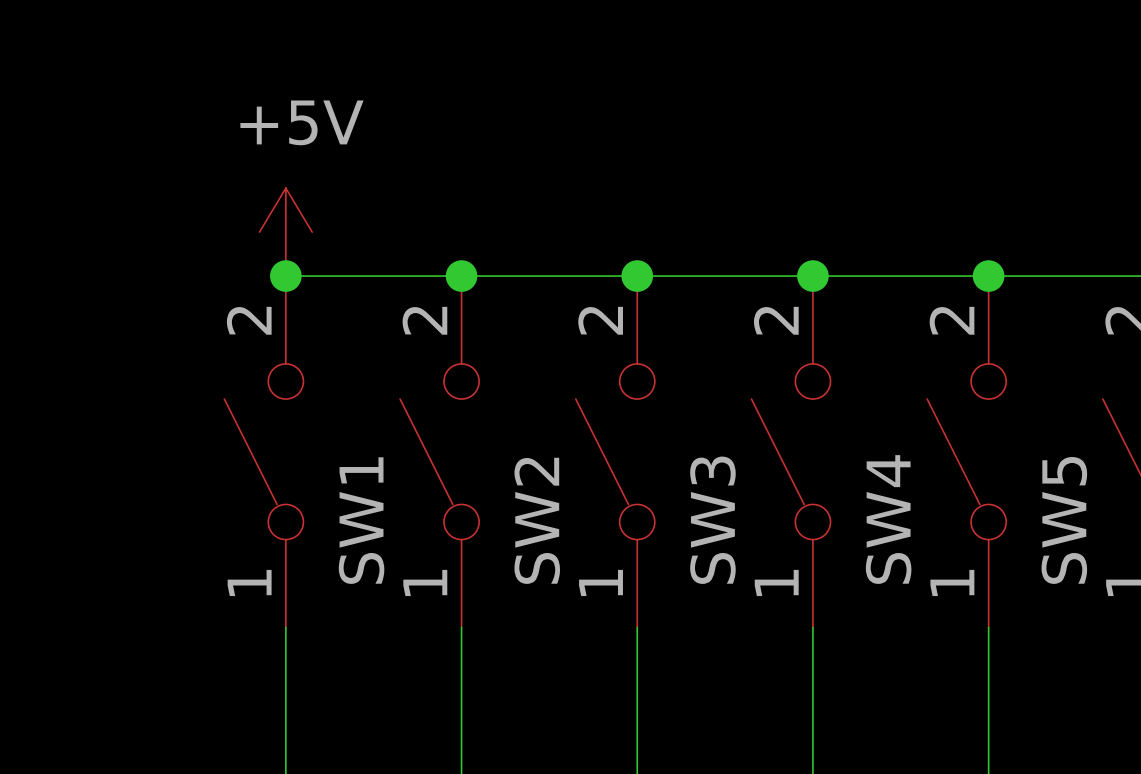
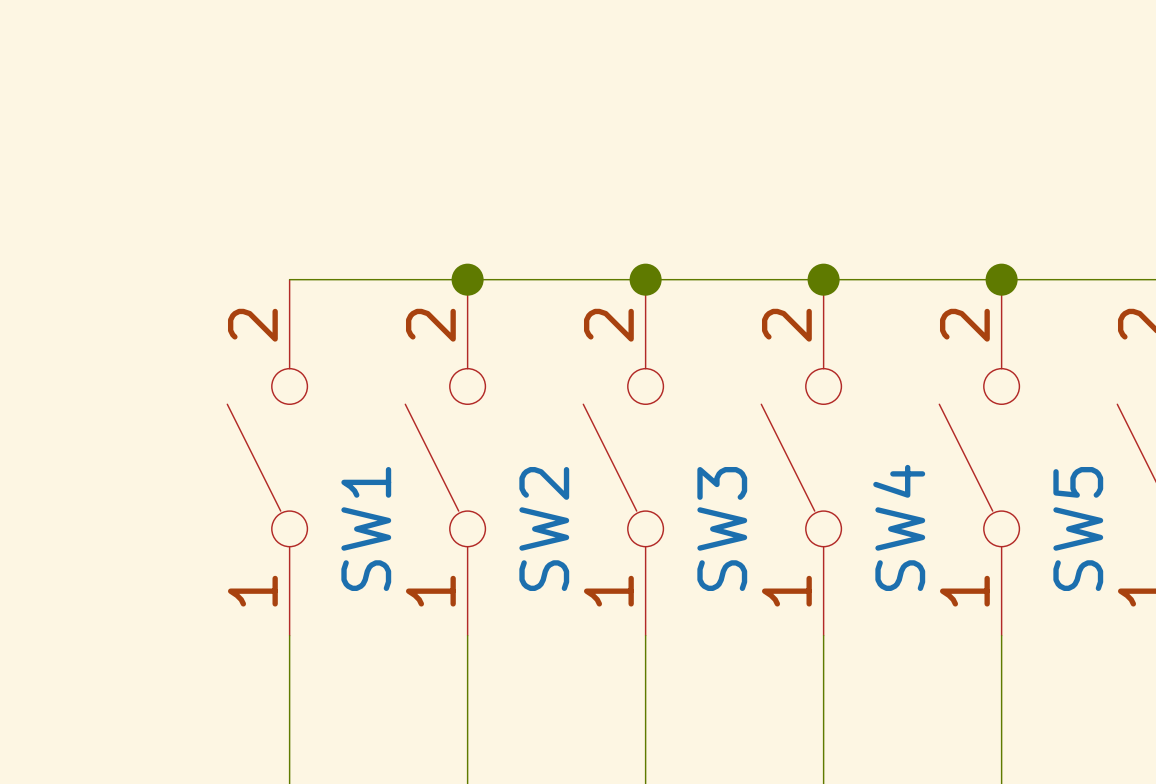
power symbol: +5V (285, 232) -> none
junction: (285, 276) -> none

